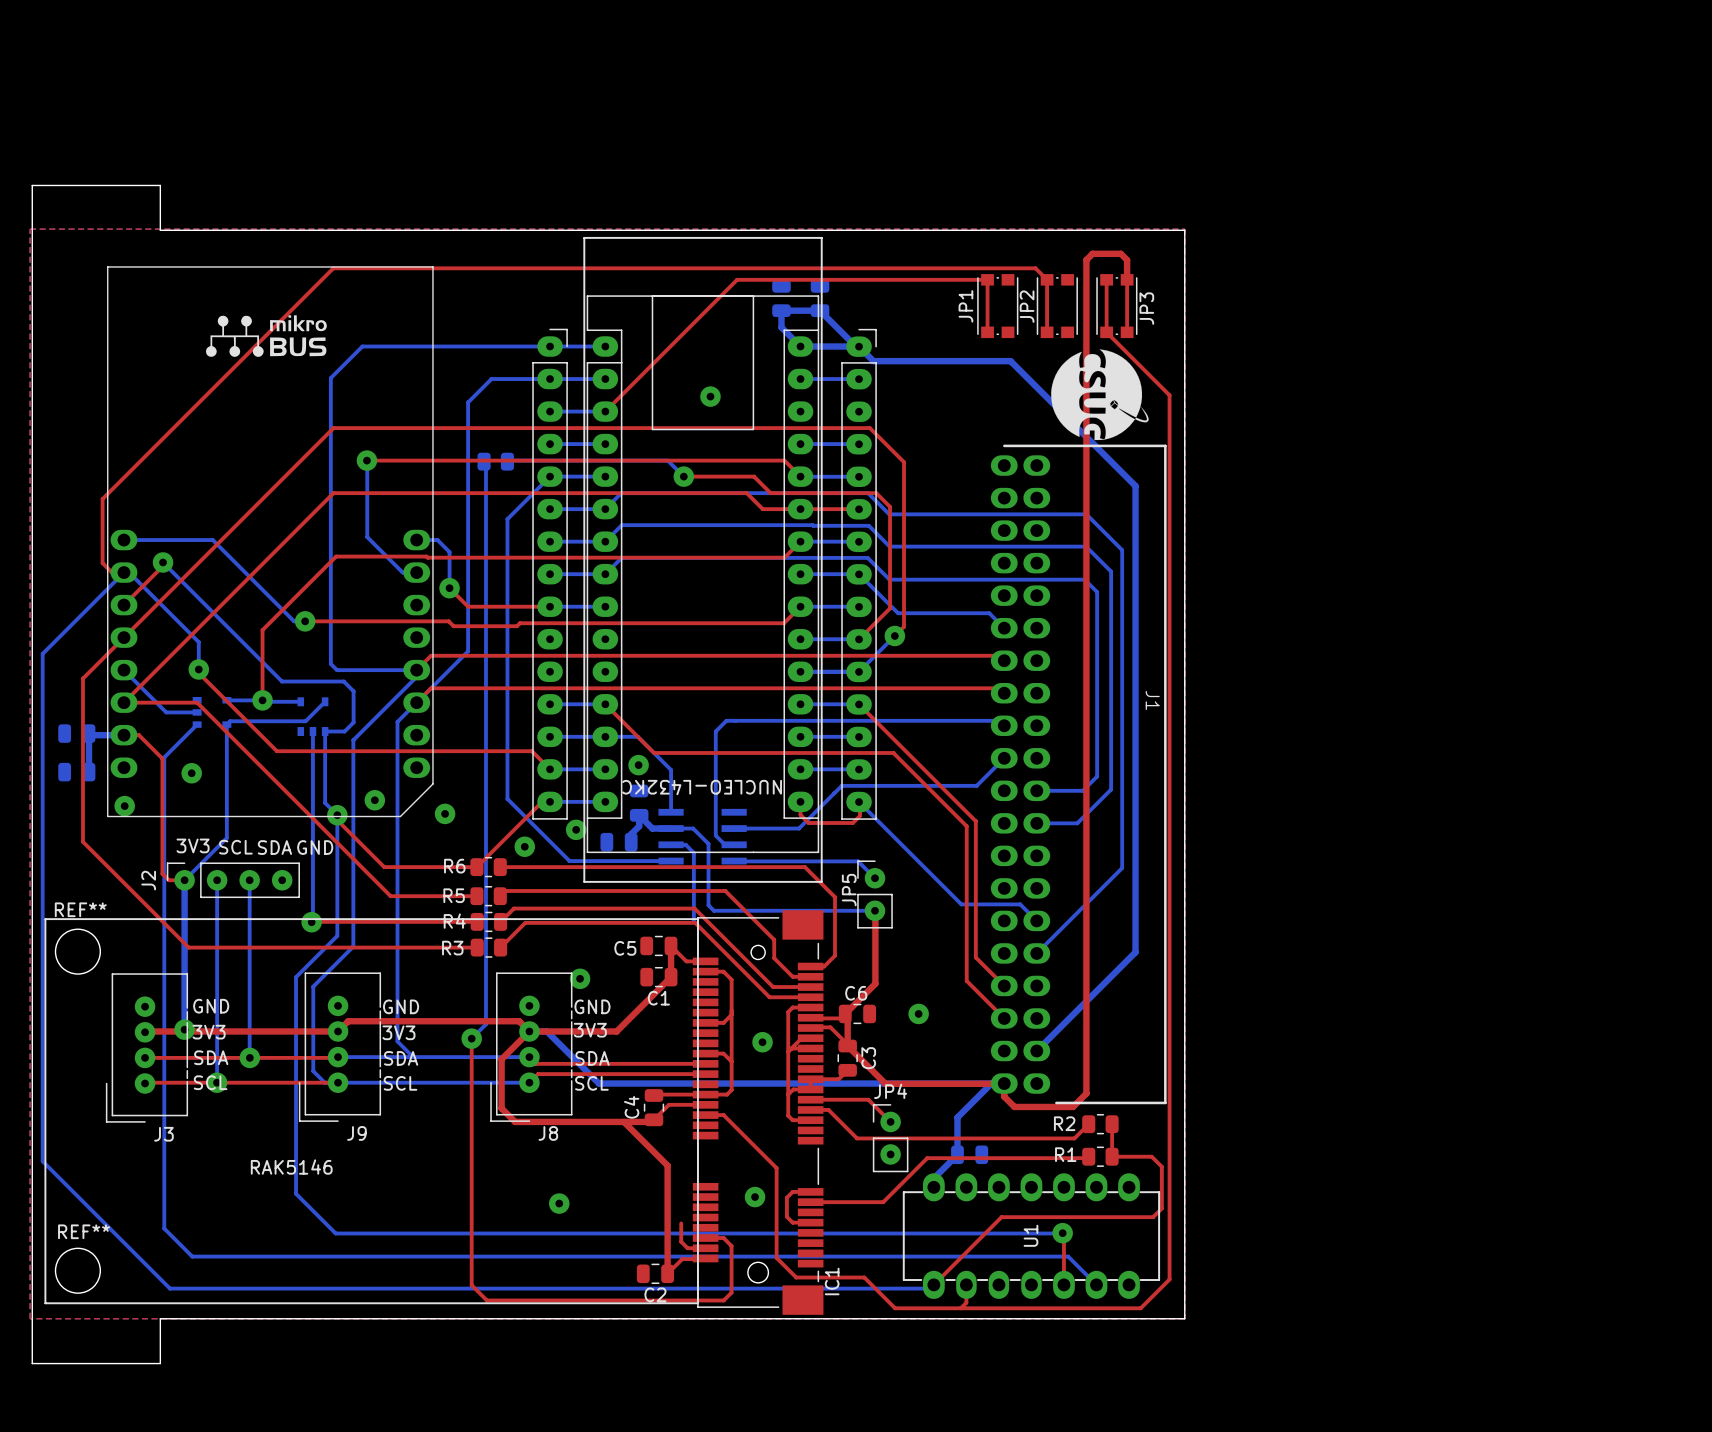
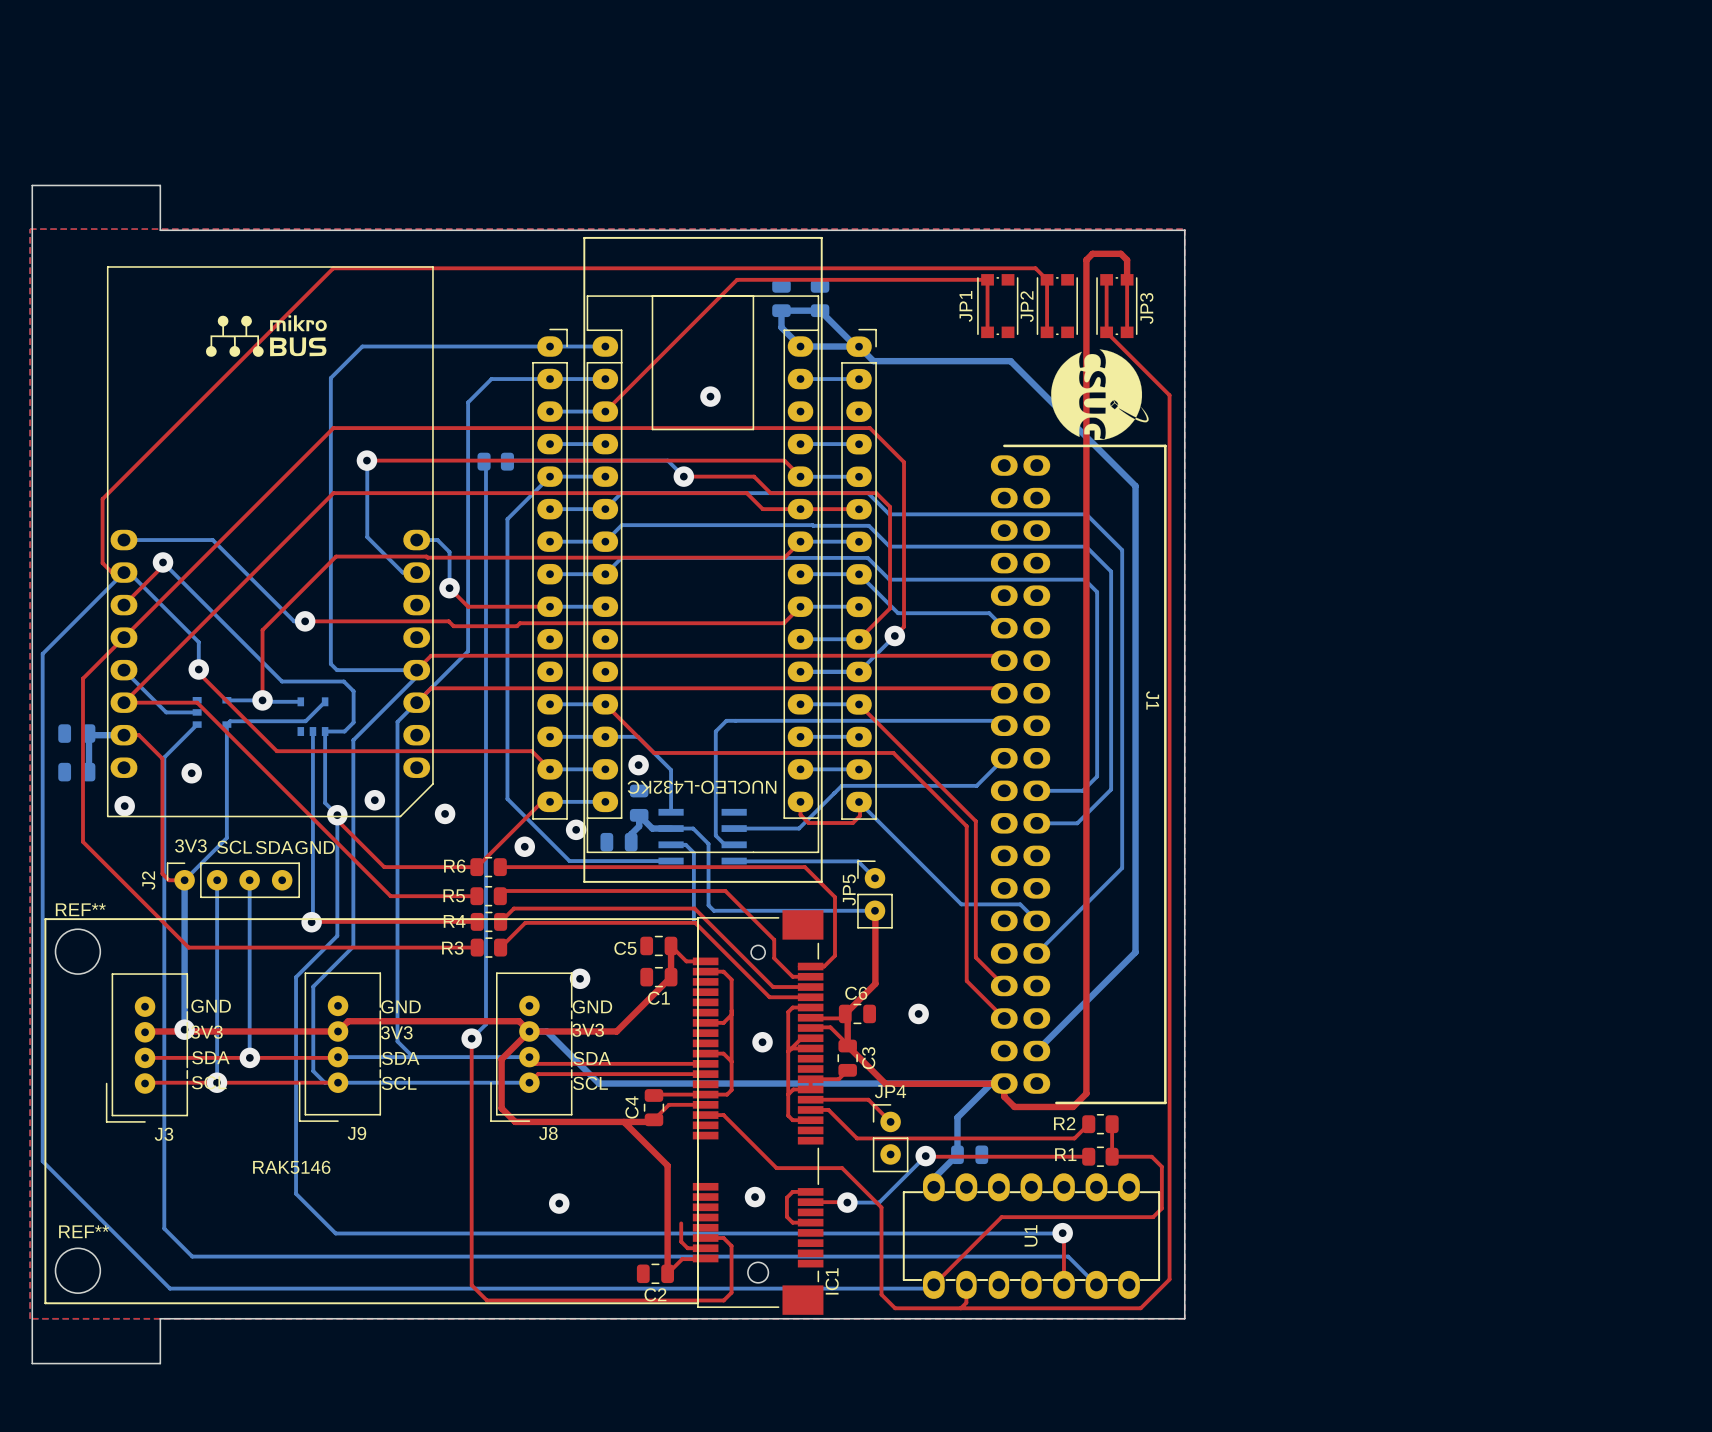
bottom track: none -> (925, 1156) (879, 1202) (847, 1202)
via: none -> (925, 1156)
top track: (1088, 1156) (927, 1158) (883, 1202) (846, 1202) -> (1088, 1156) (925, 1156)
top track: (776, 1168) (776, 1257) (796, 1277) (864, 1277) (881, 1294) -> (776, 1168) (842, 1168) (881, 1207) (881, 1294)
via: none -> (847, 1202)

